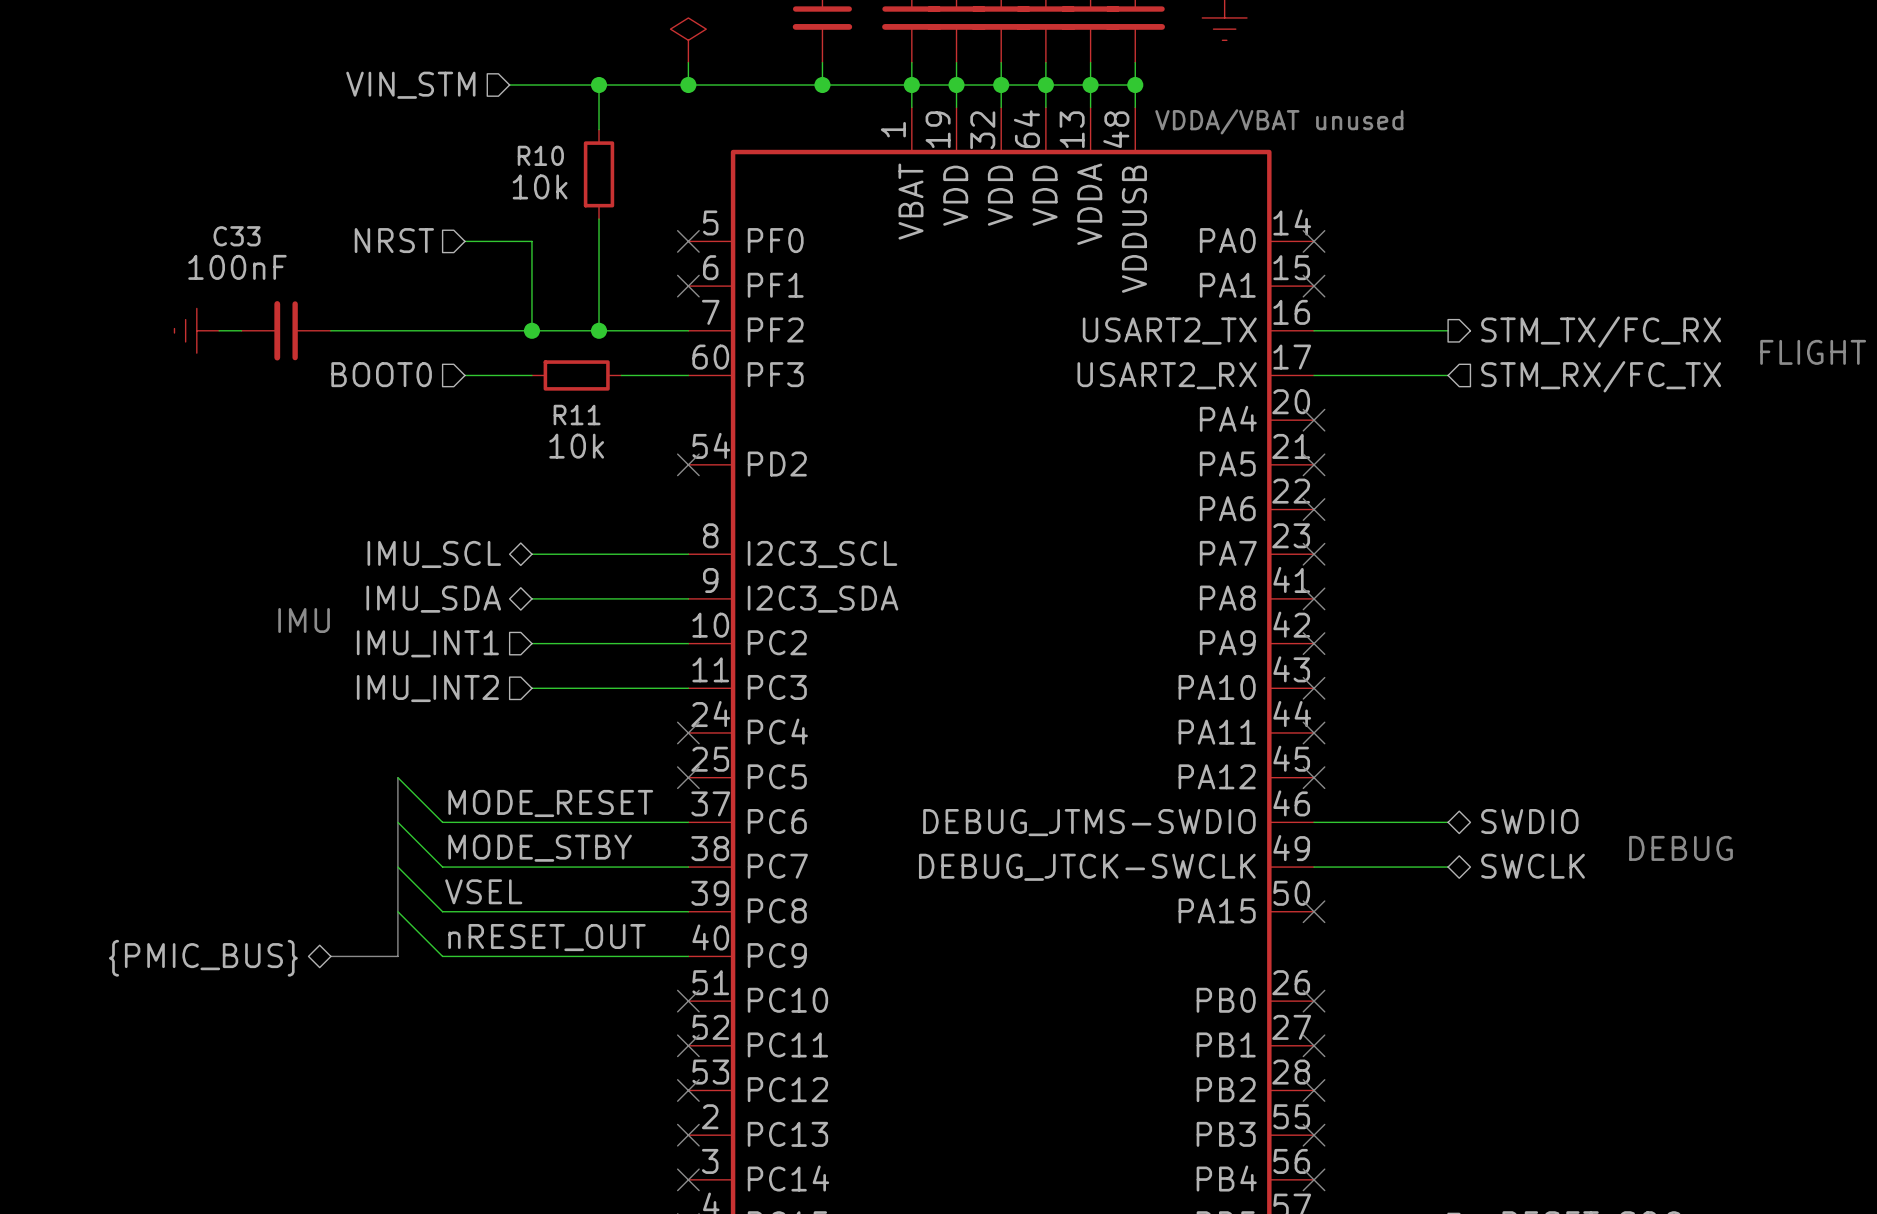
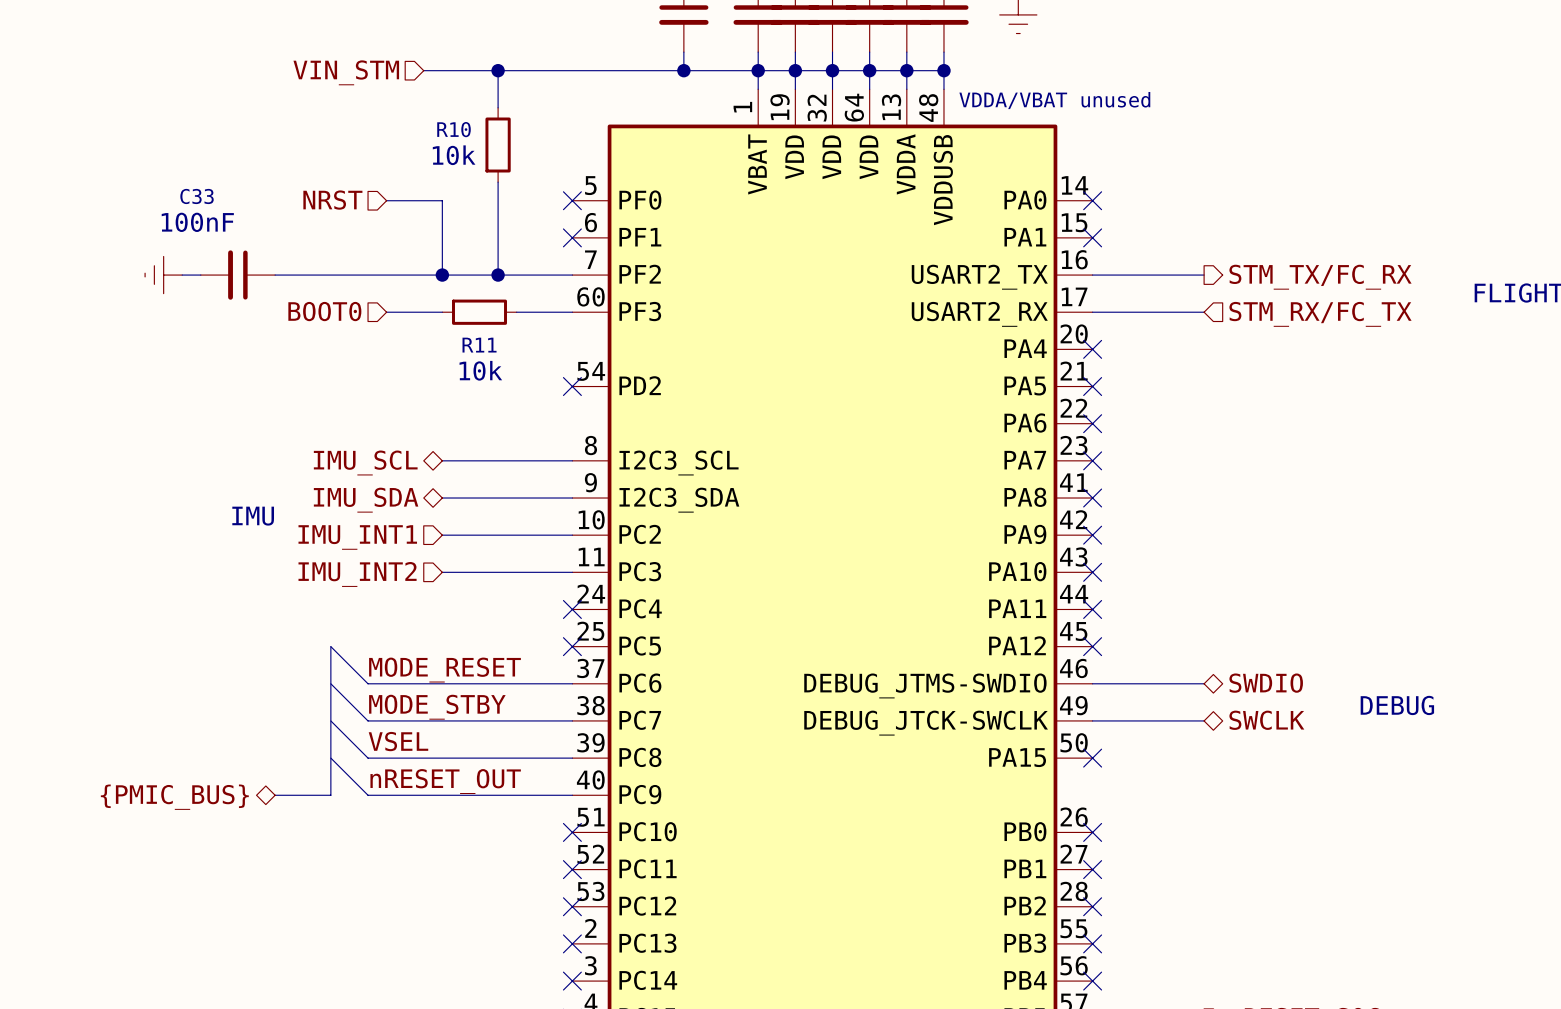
power symbol: (688, 40) -> none
wire: (688, 62) (688, 85) -> none
junction: (688, 85) -> none

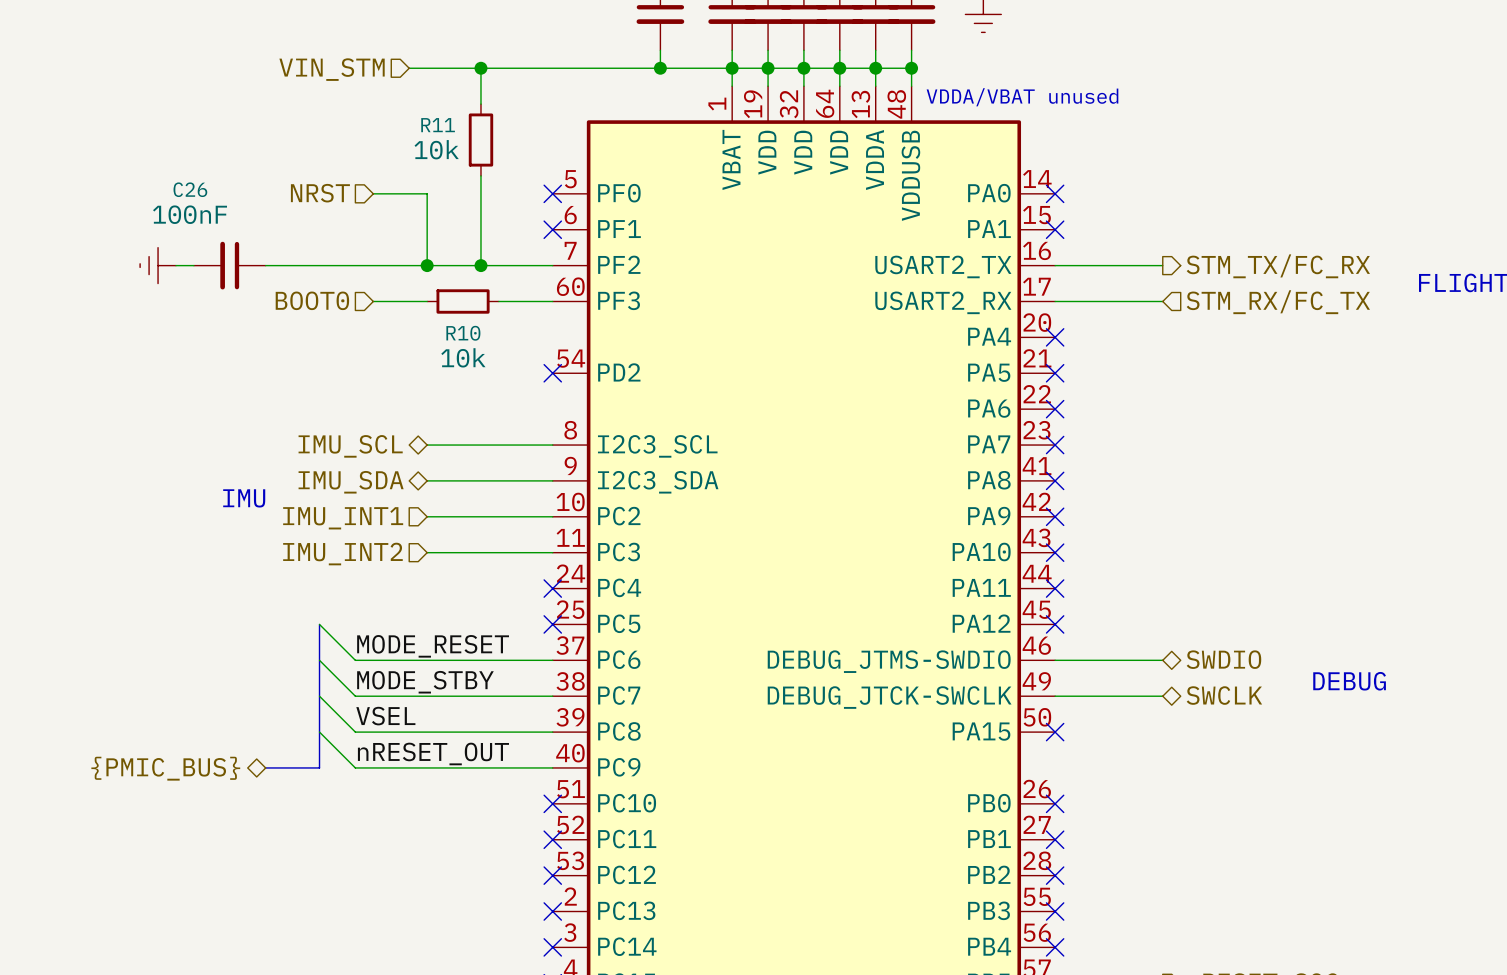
R10 name: R10 (454, 129) -> R11 (438, 125)
C33 name: C33 (197, 196) -> C26 (190, 189)
R11 name: R11 (479, 345) -> R10 (463, 333)

